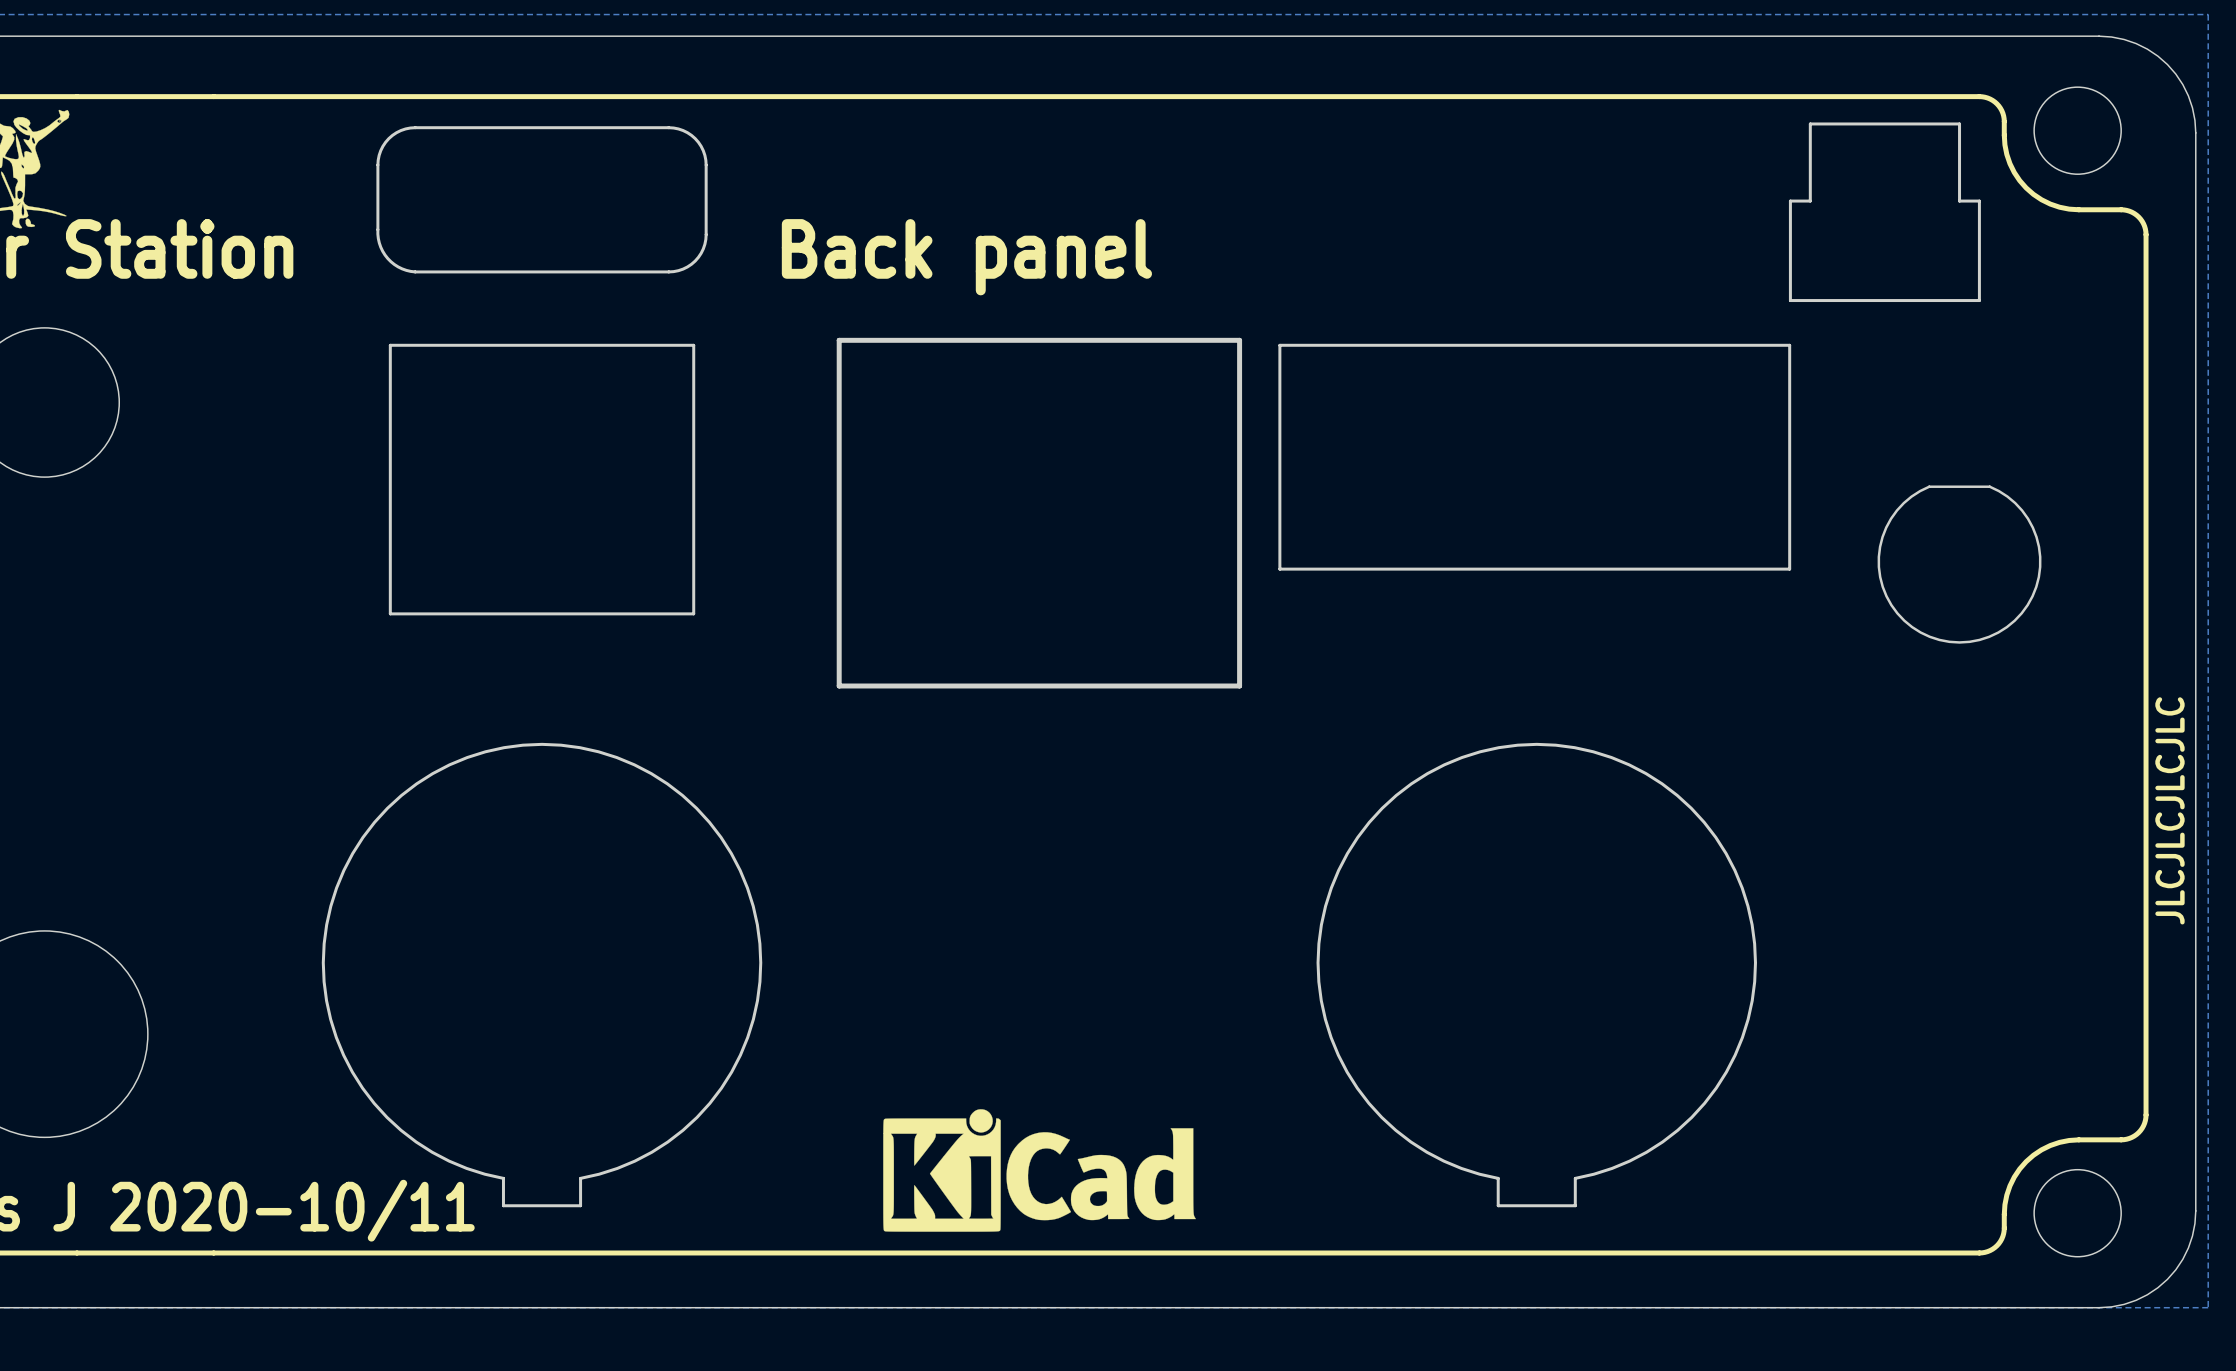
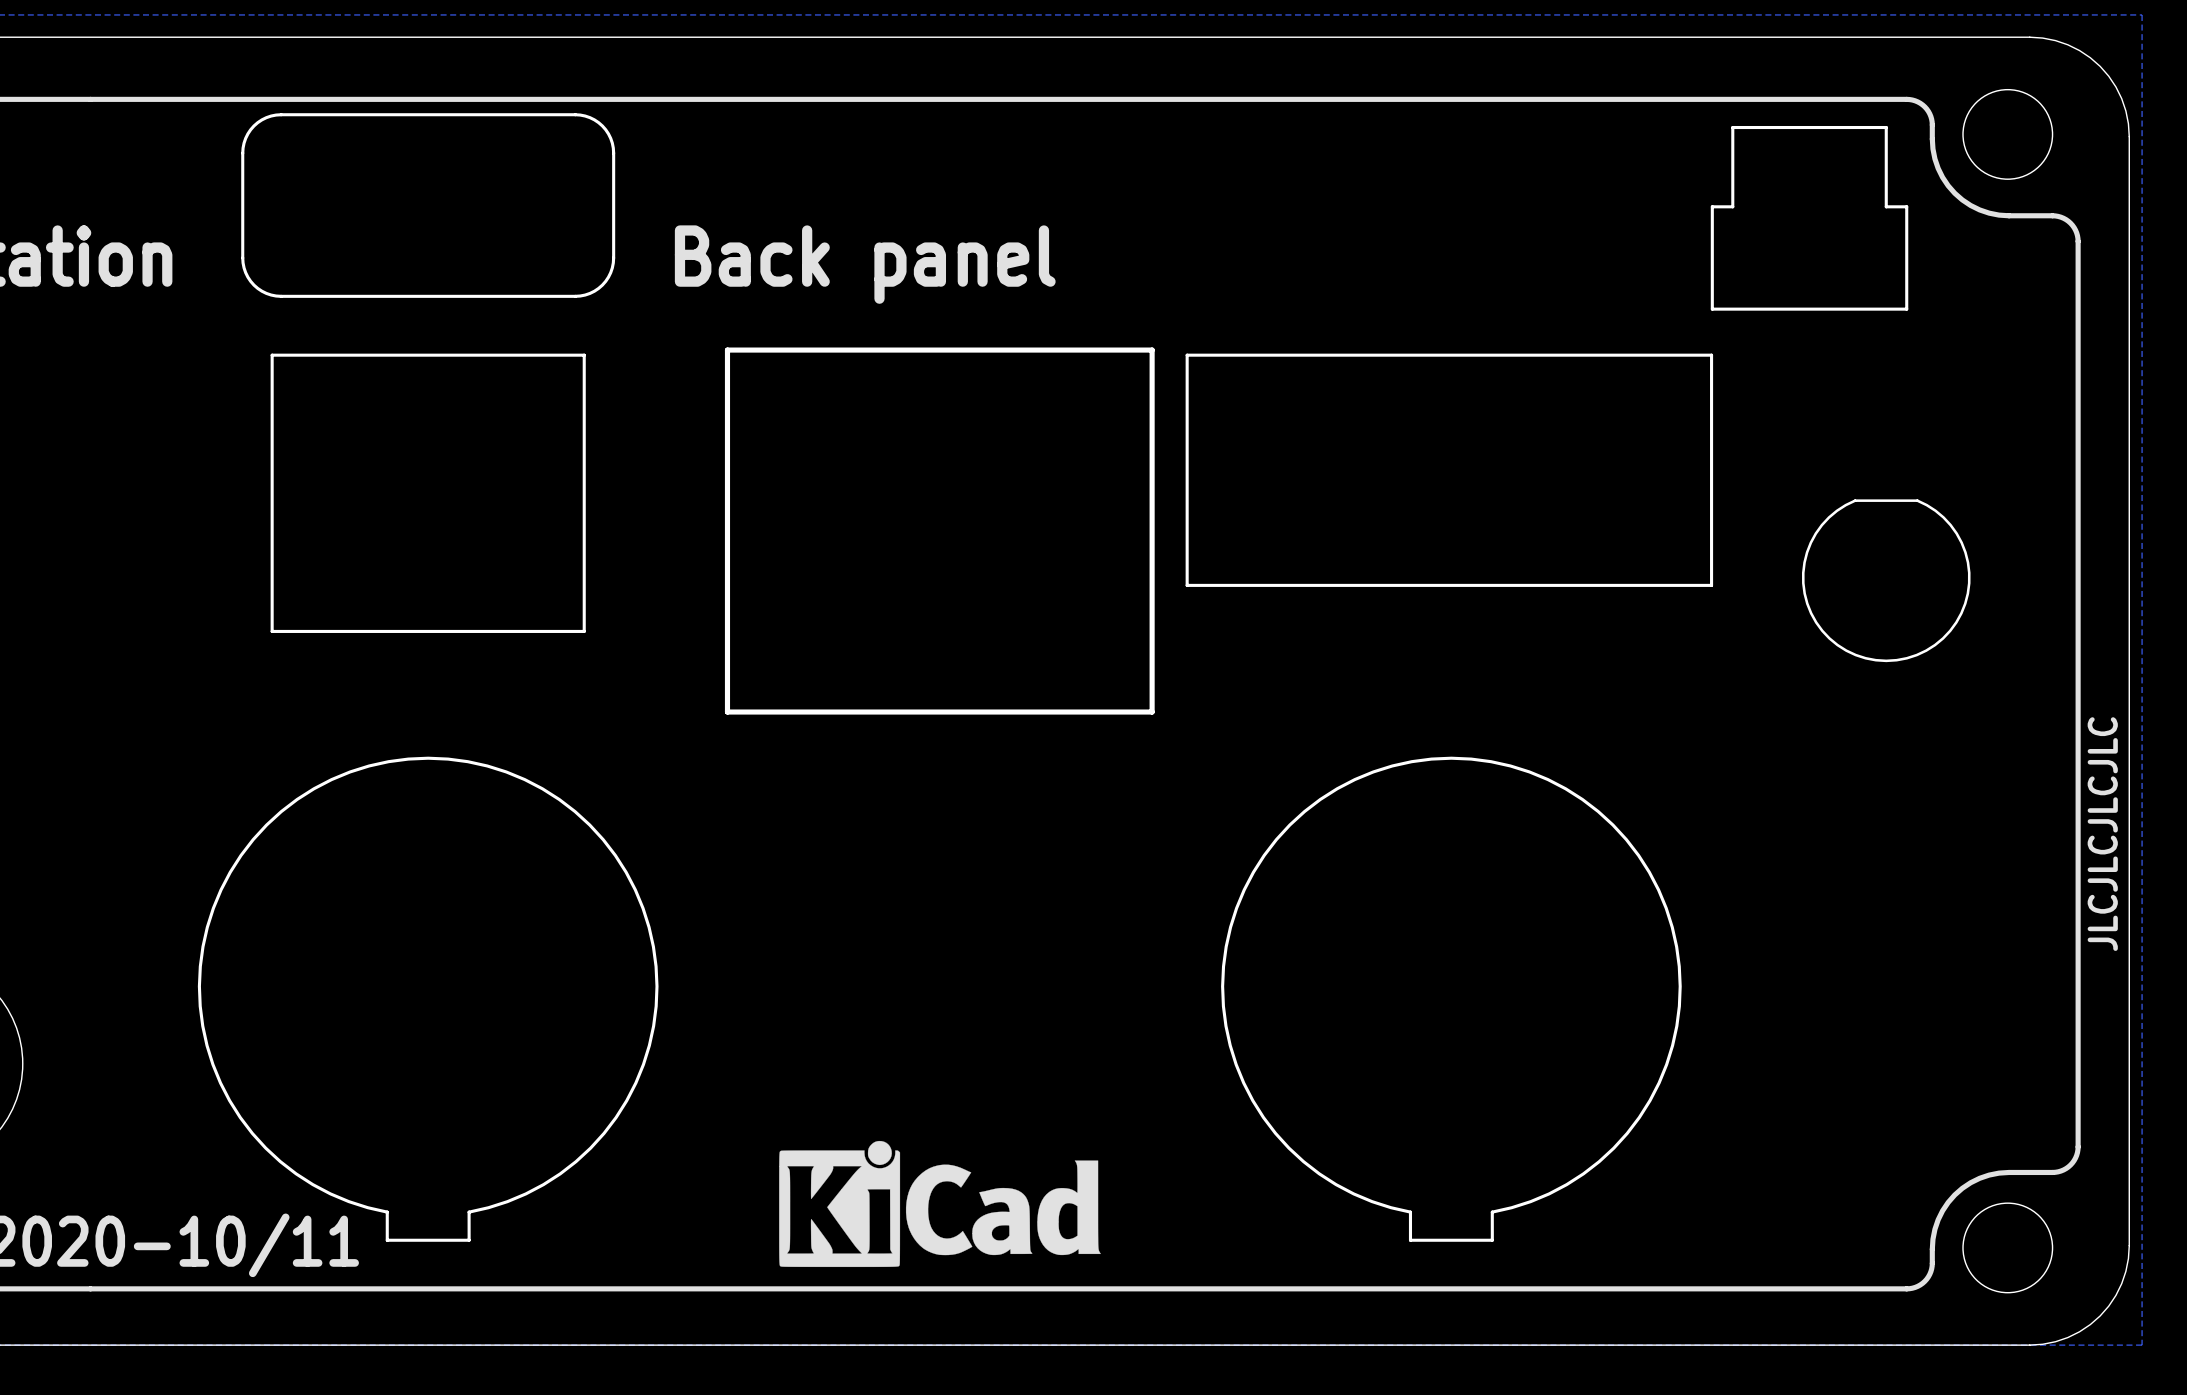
drawing shape: [376, 126, 708, 274] -> [241, 113, 616, 298]
drawing shape: [836, 337, 1243, 689] -> [724, 347, 1155, 715]
drawing shape: [321, 742, 763, 1208] -> [197, 756, 659, 1242]
drawing shape: [1316, 742, 1757, 1208] -> [1221, 756, 1682, 1242]

